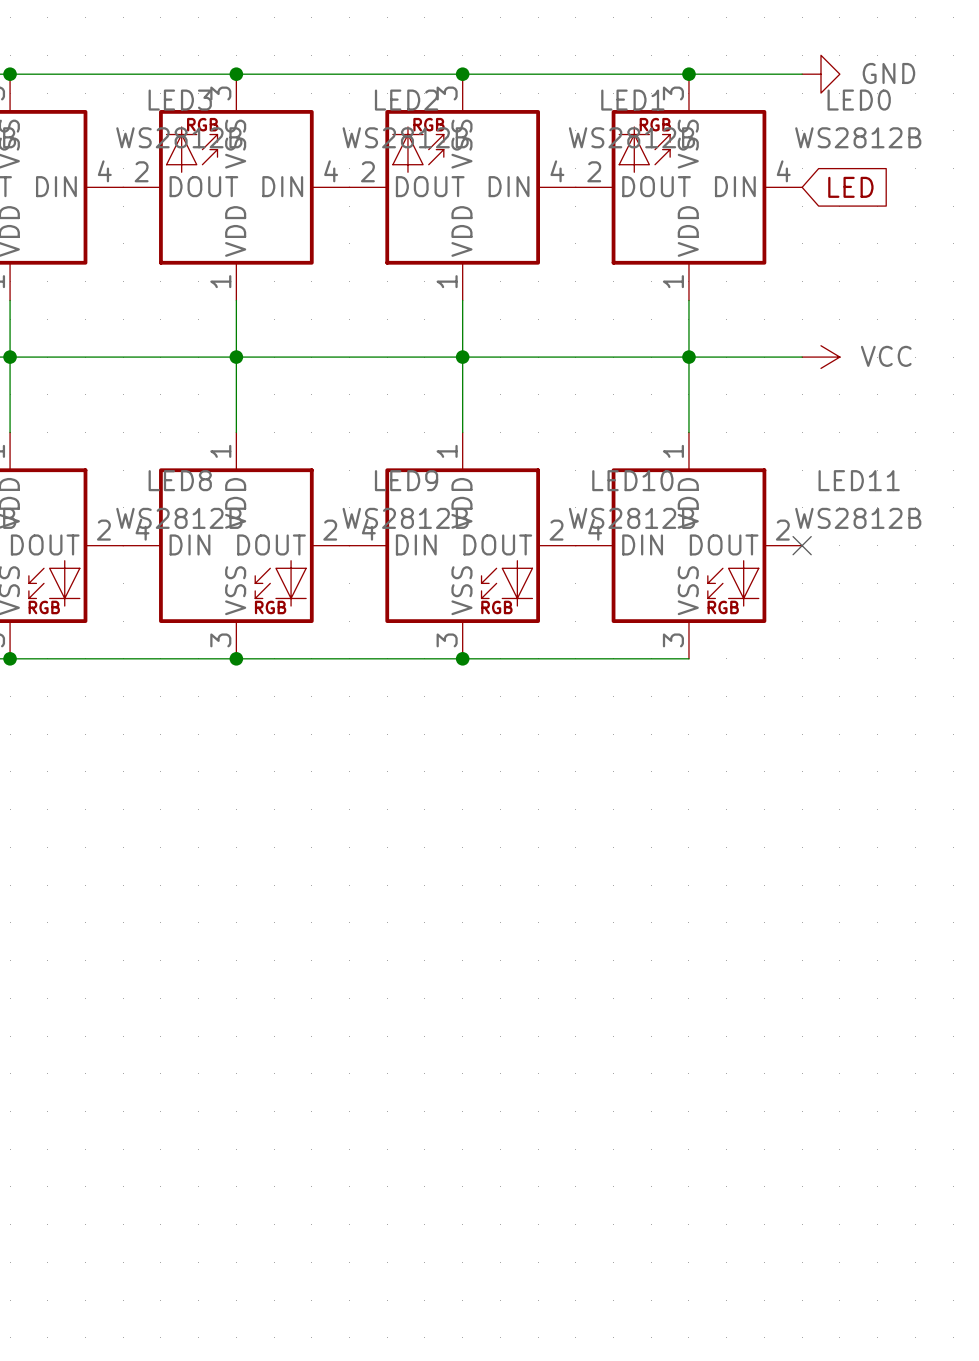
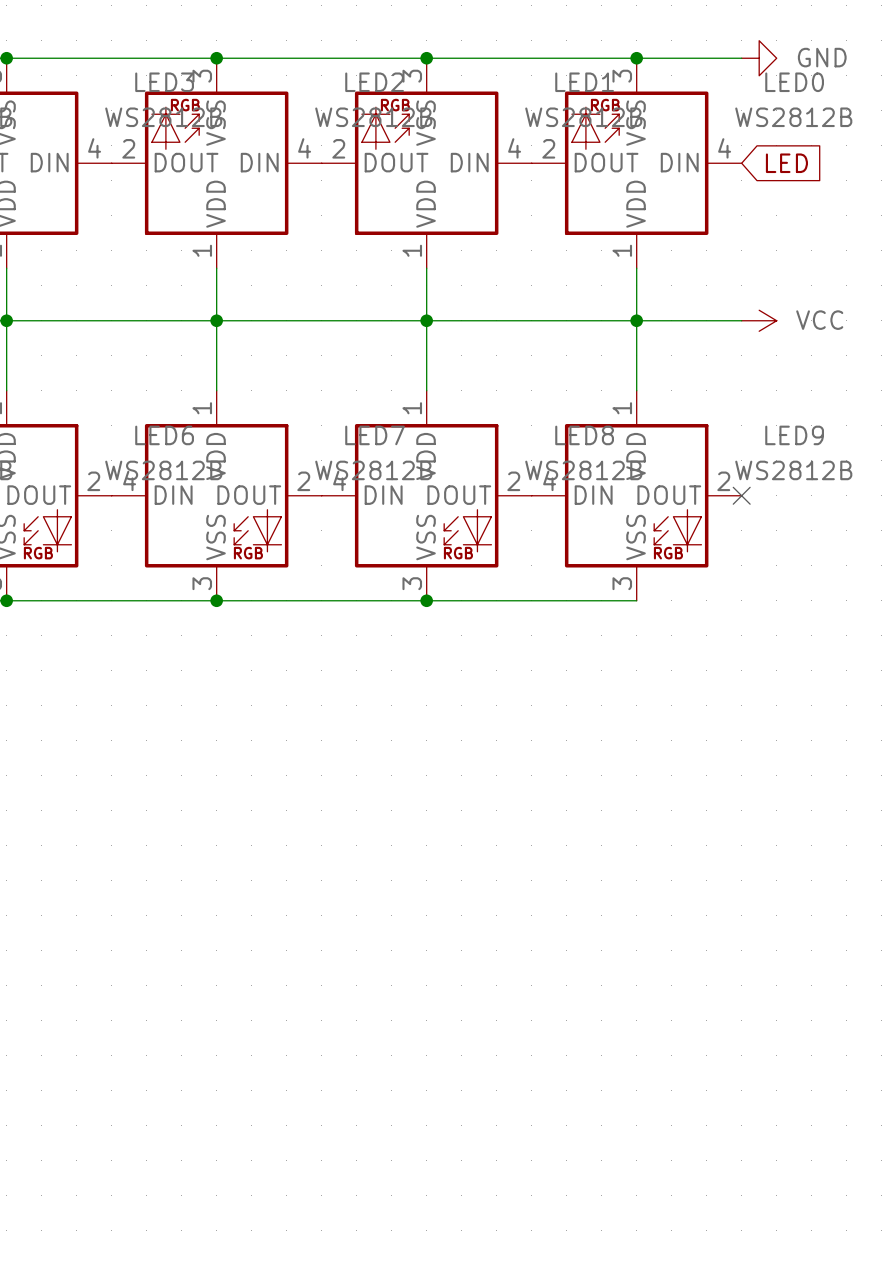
LED8 name: LED8 (180, 480) -> LED6 (164, 435)
LED9 name: LED9 (406, 480) -> LED7 (375, 435)
LED10 name: LED10 (632, 480) -> LED8 (584, 435)
LED11 name: LED11 (859, 480) -> LED9 (794, 435)

